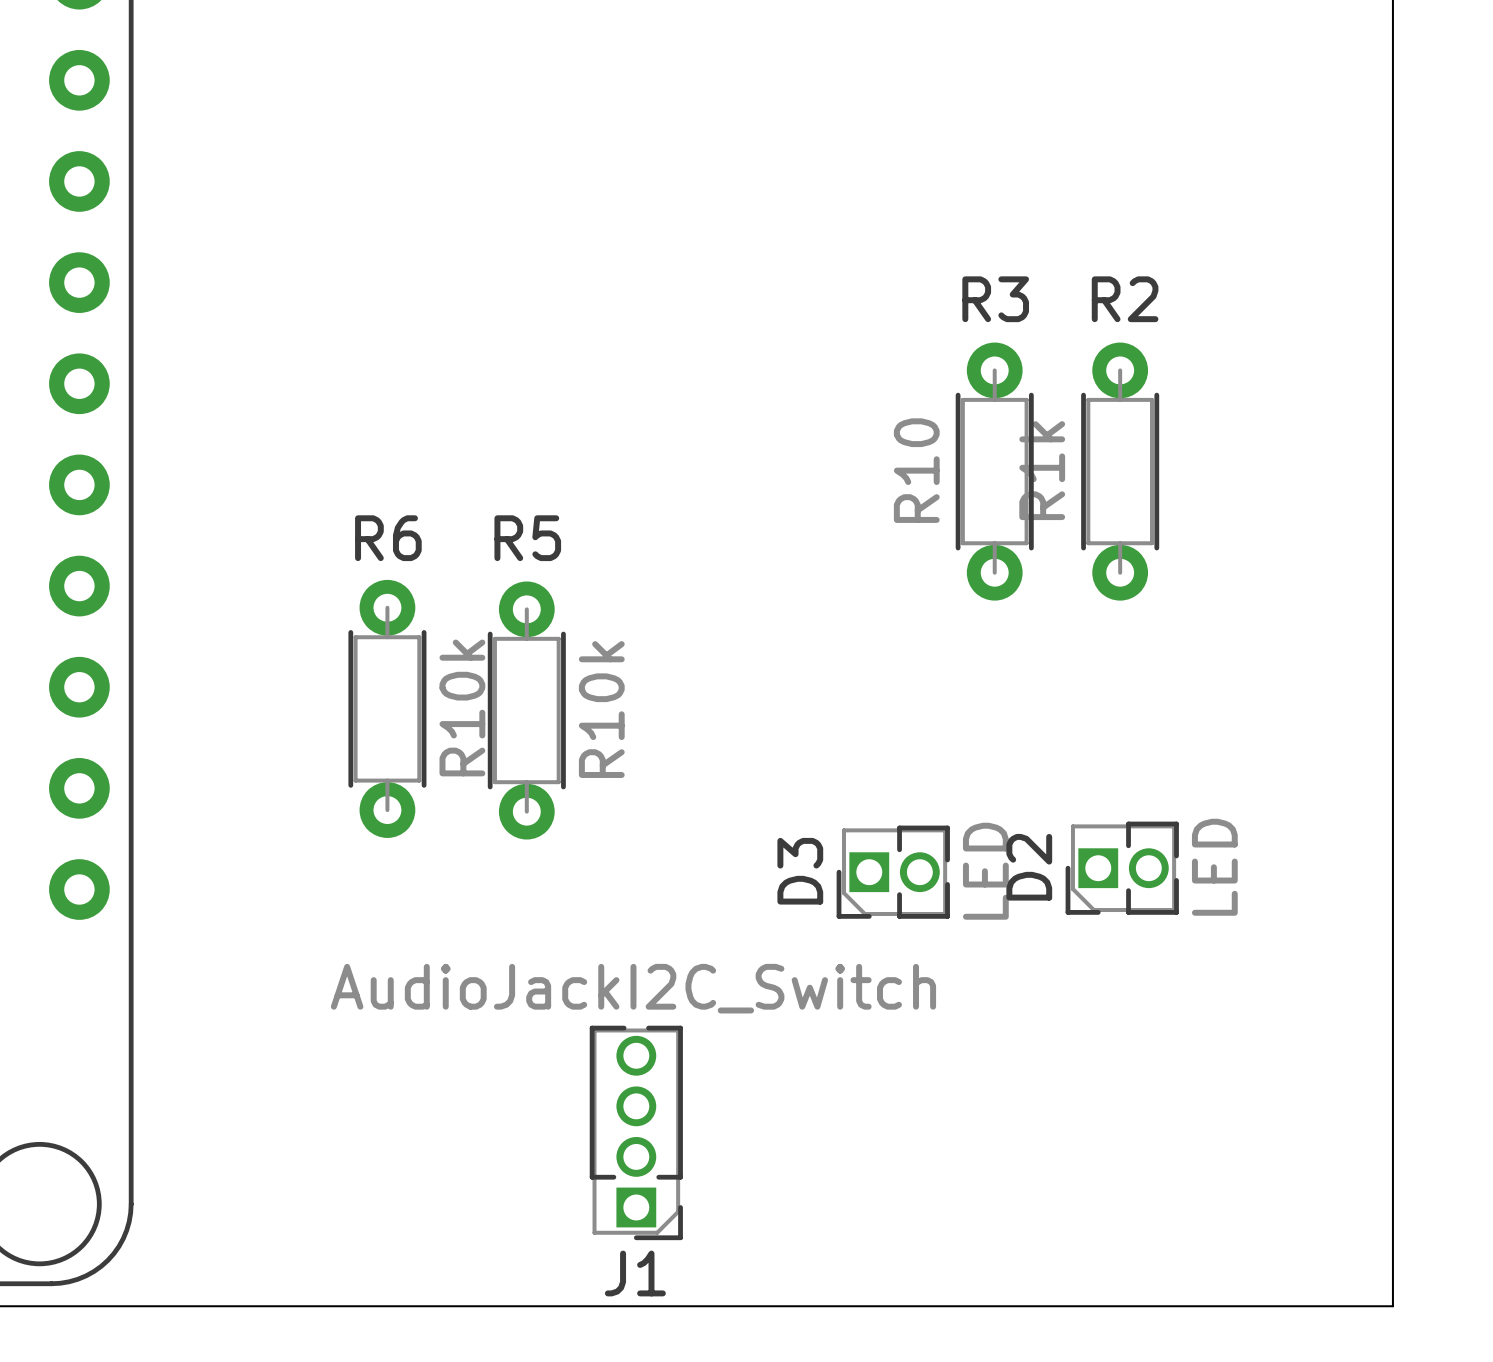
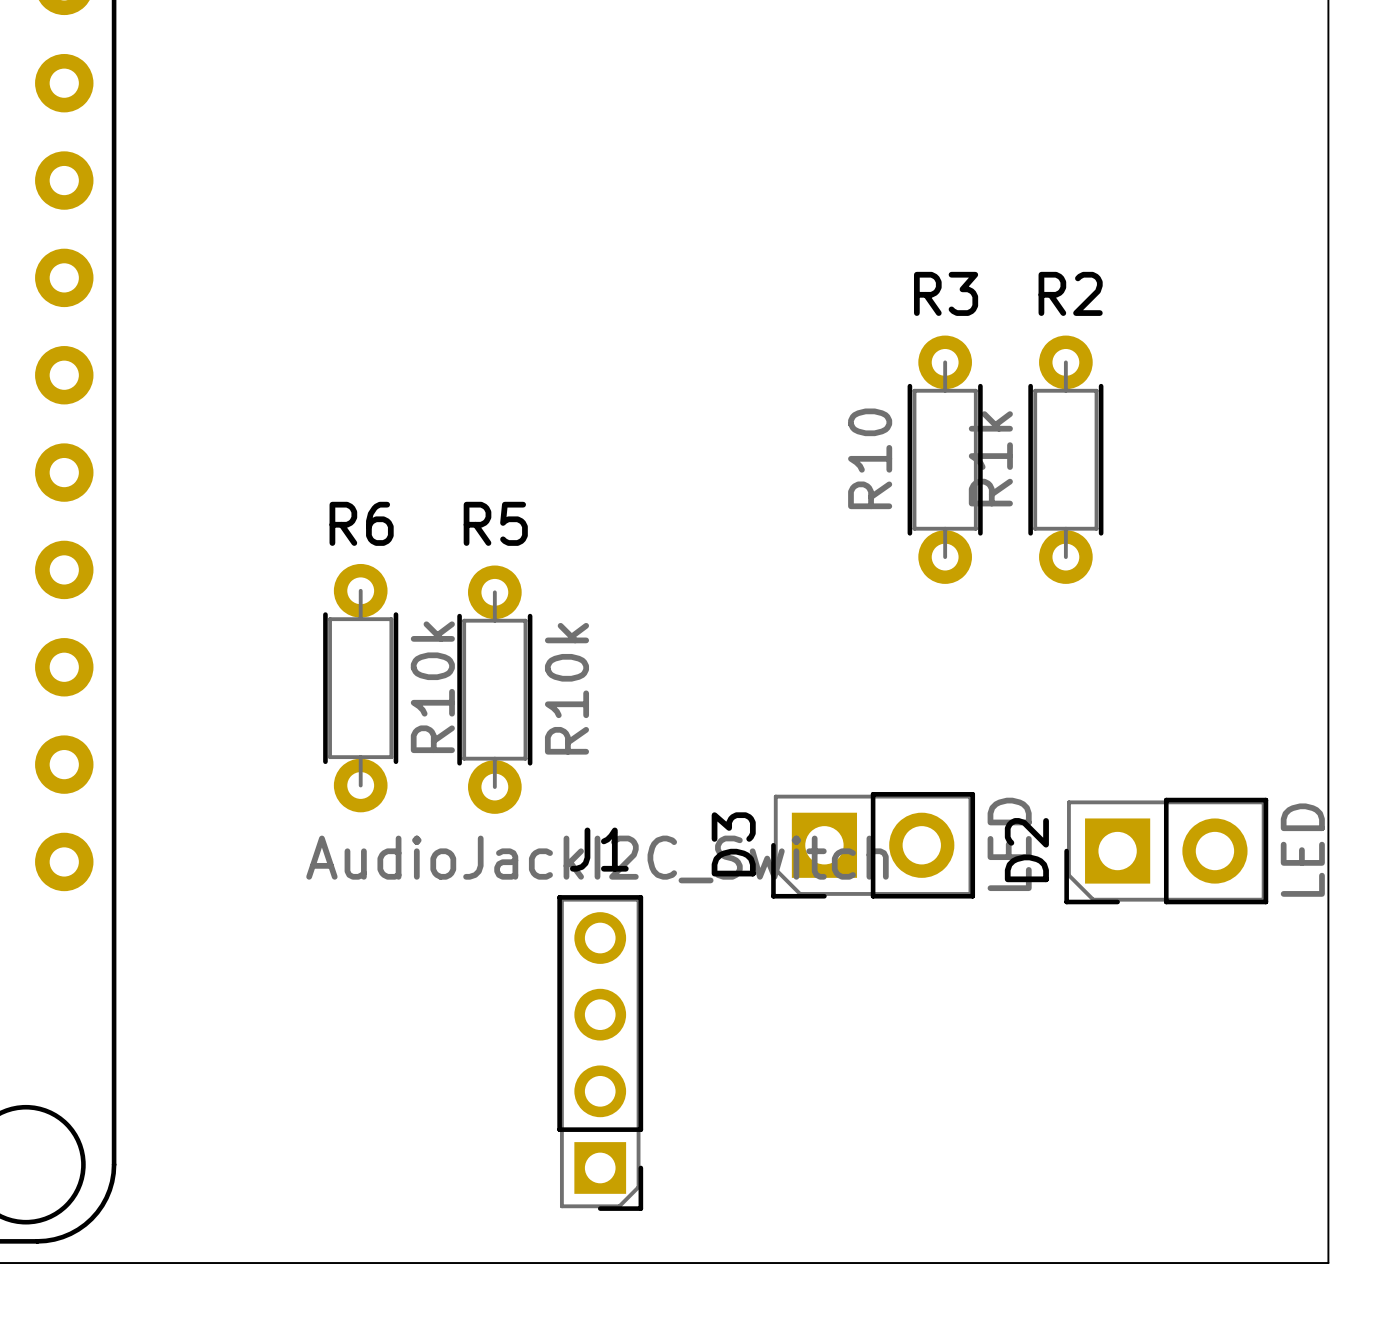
D2 footprint: [1065, 821, 1179, 915] -> [1064, 797, 1269, 905]
D3 footprint: [836, 825, 950, 919] -> [771, 792, 976, 899]
J1 footprint: [589, 1025, 683, 1241] -> [557, 895, 644, 1211]
J1 name position: J1 (635, 1273) -> J1 (599, 849)

